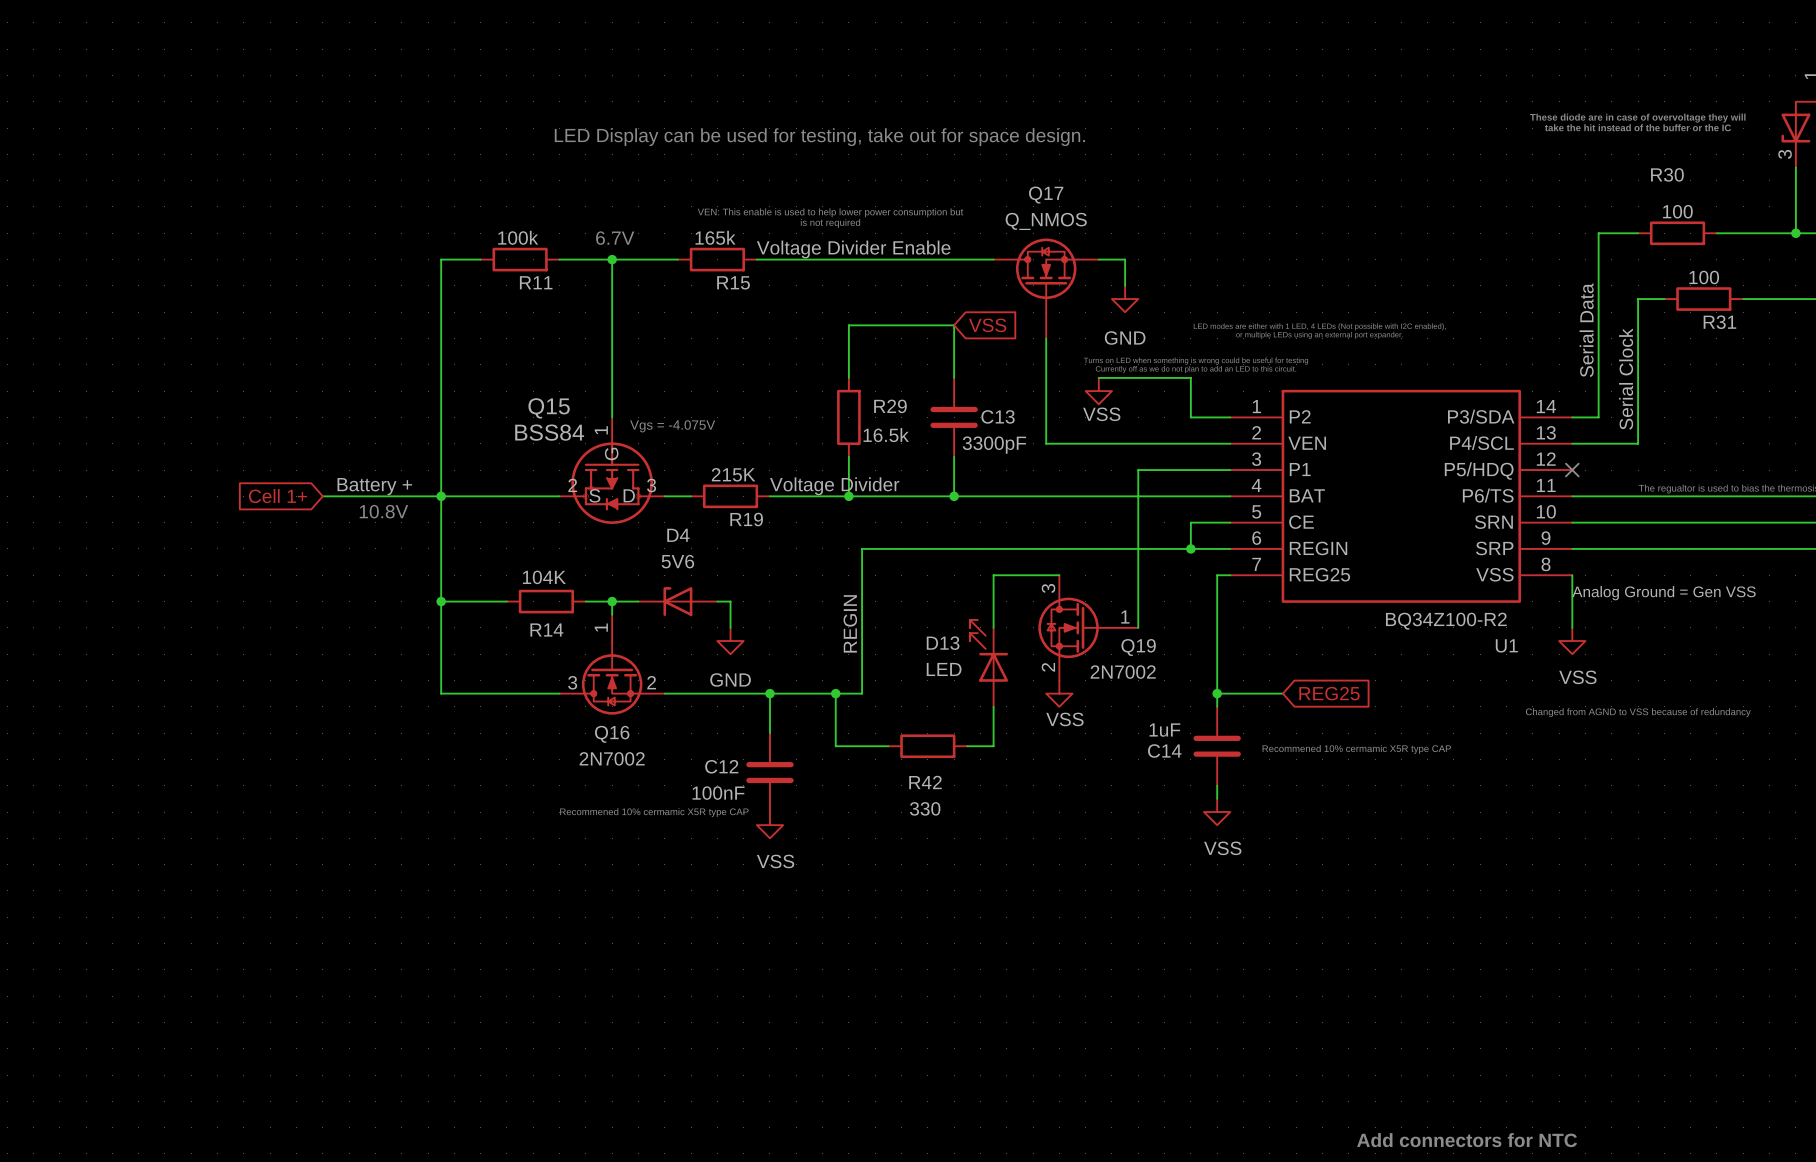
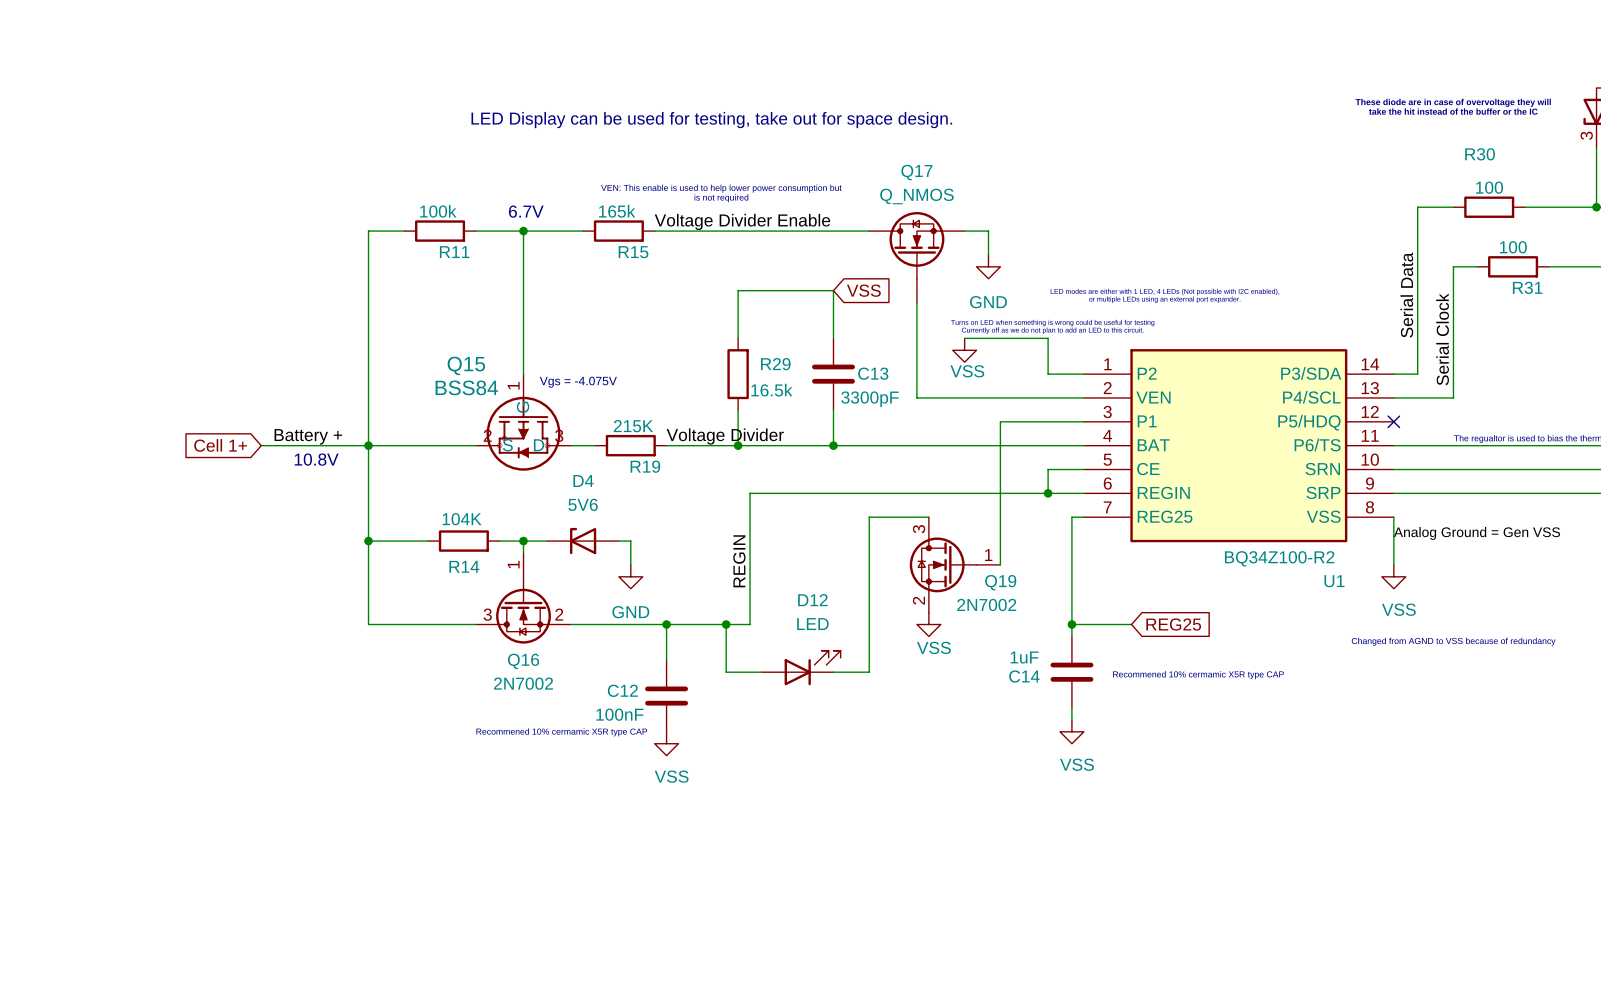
D13: LED (988, 663) -> none
D12: none -> LED (801, 668)
R42: 330 (927, 746) -> none

